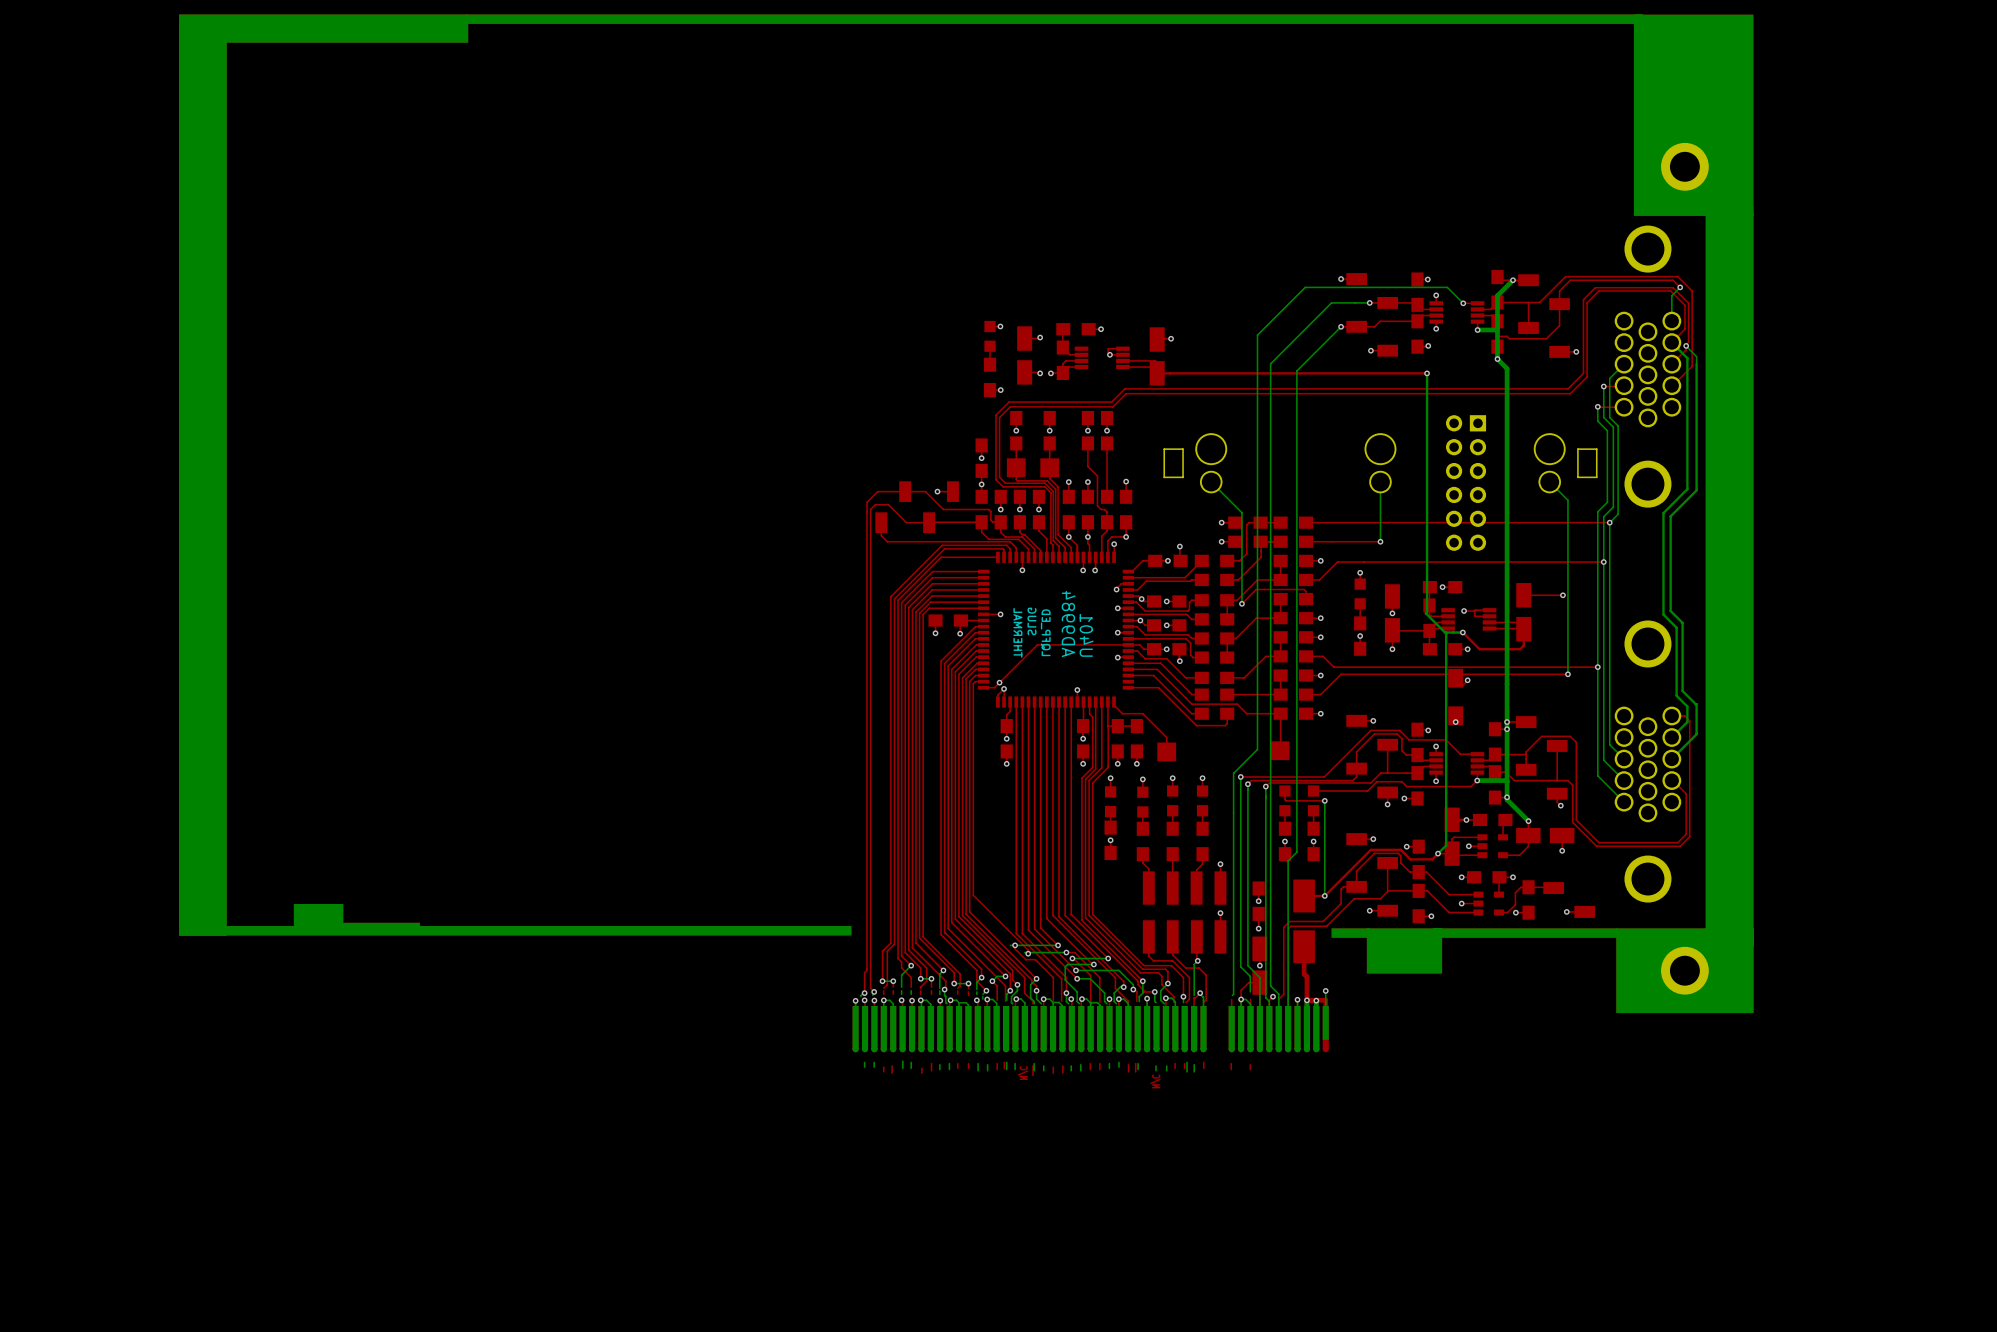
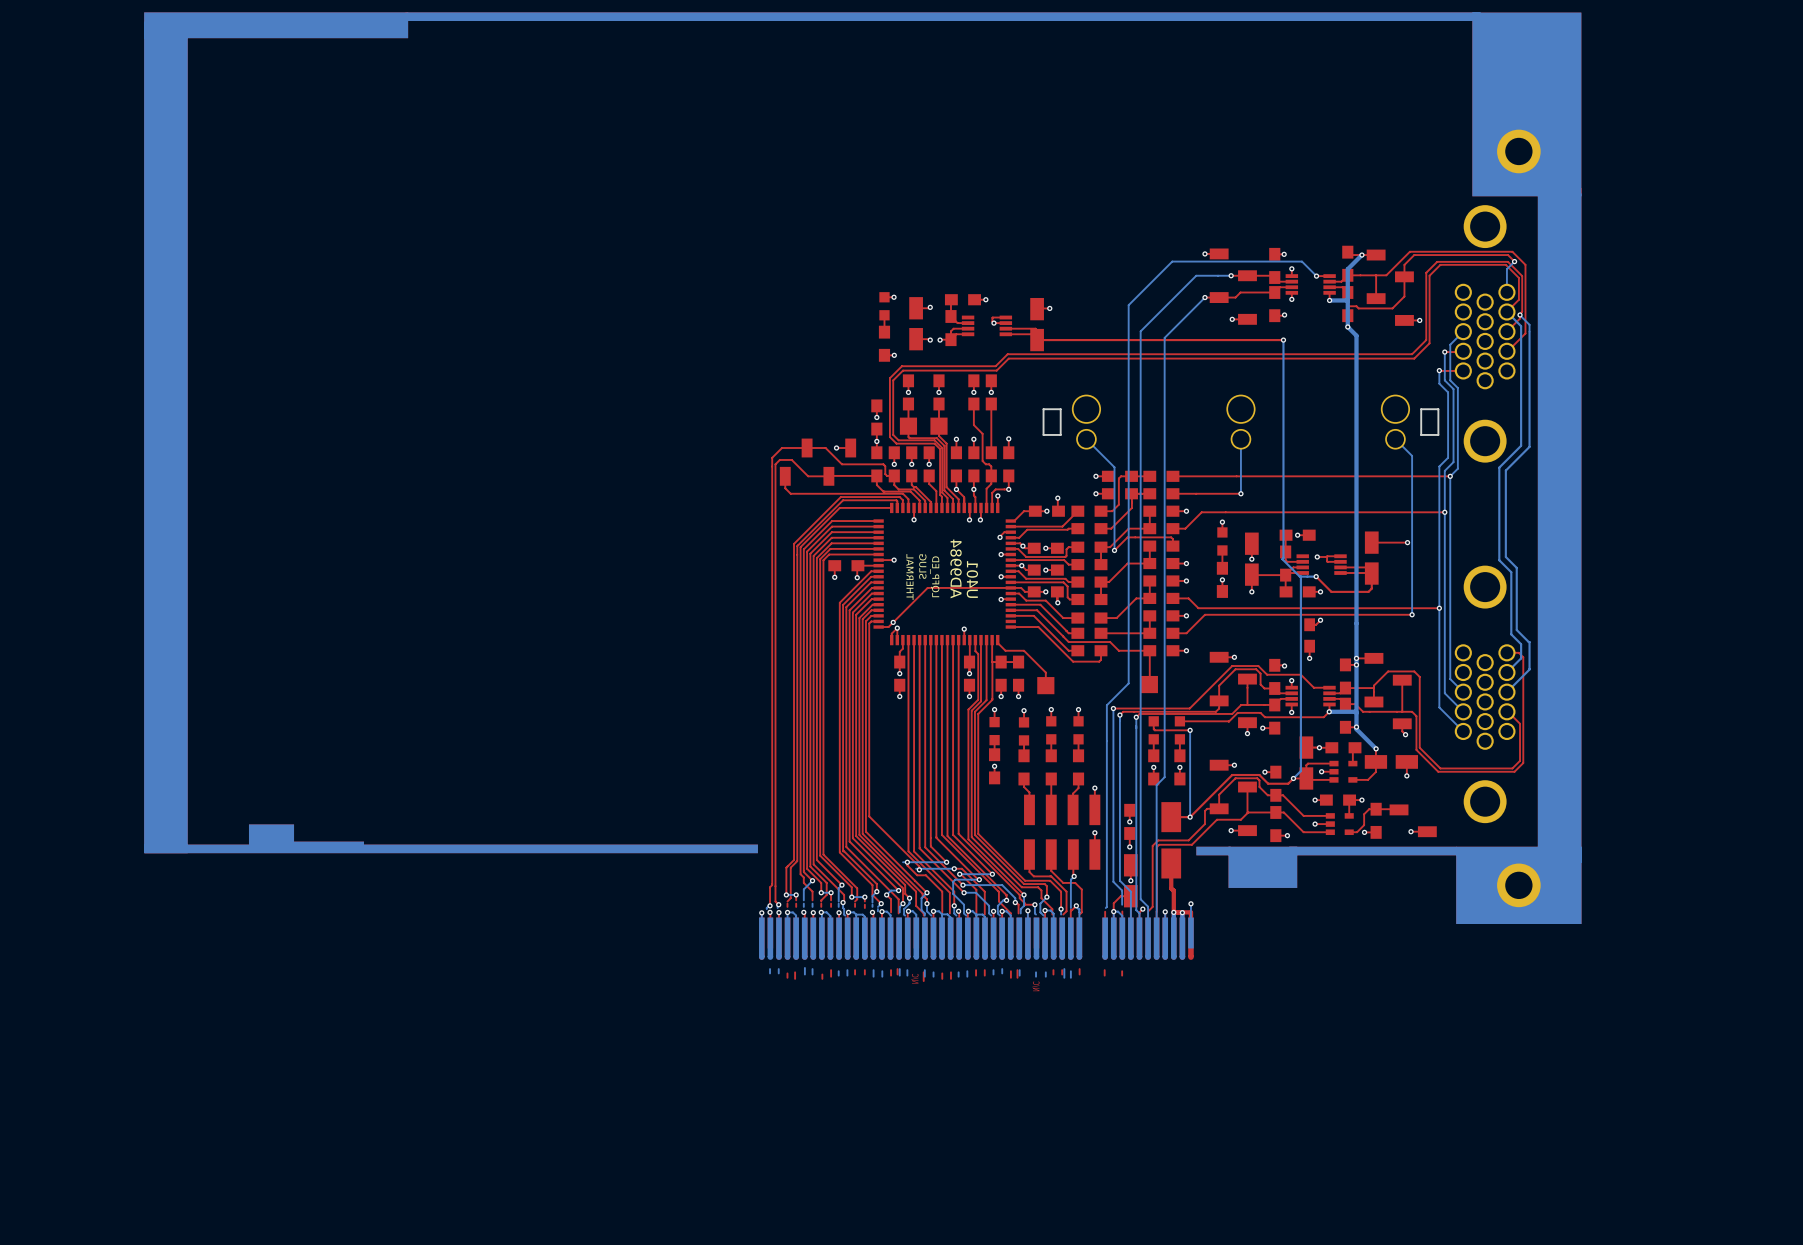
part: (1466, 483) -> none
part footprint: [1448, 668, 1464, 726] -> [1304, 618, 1315, 653]

